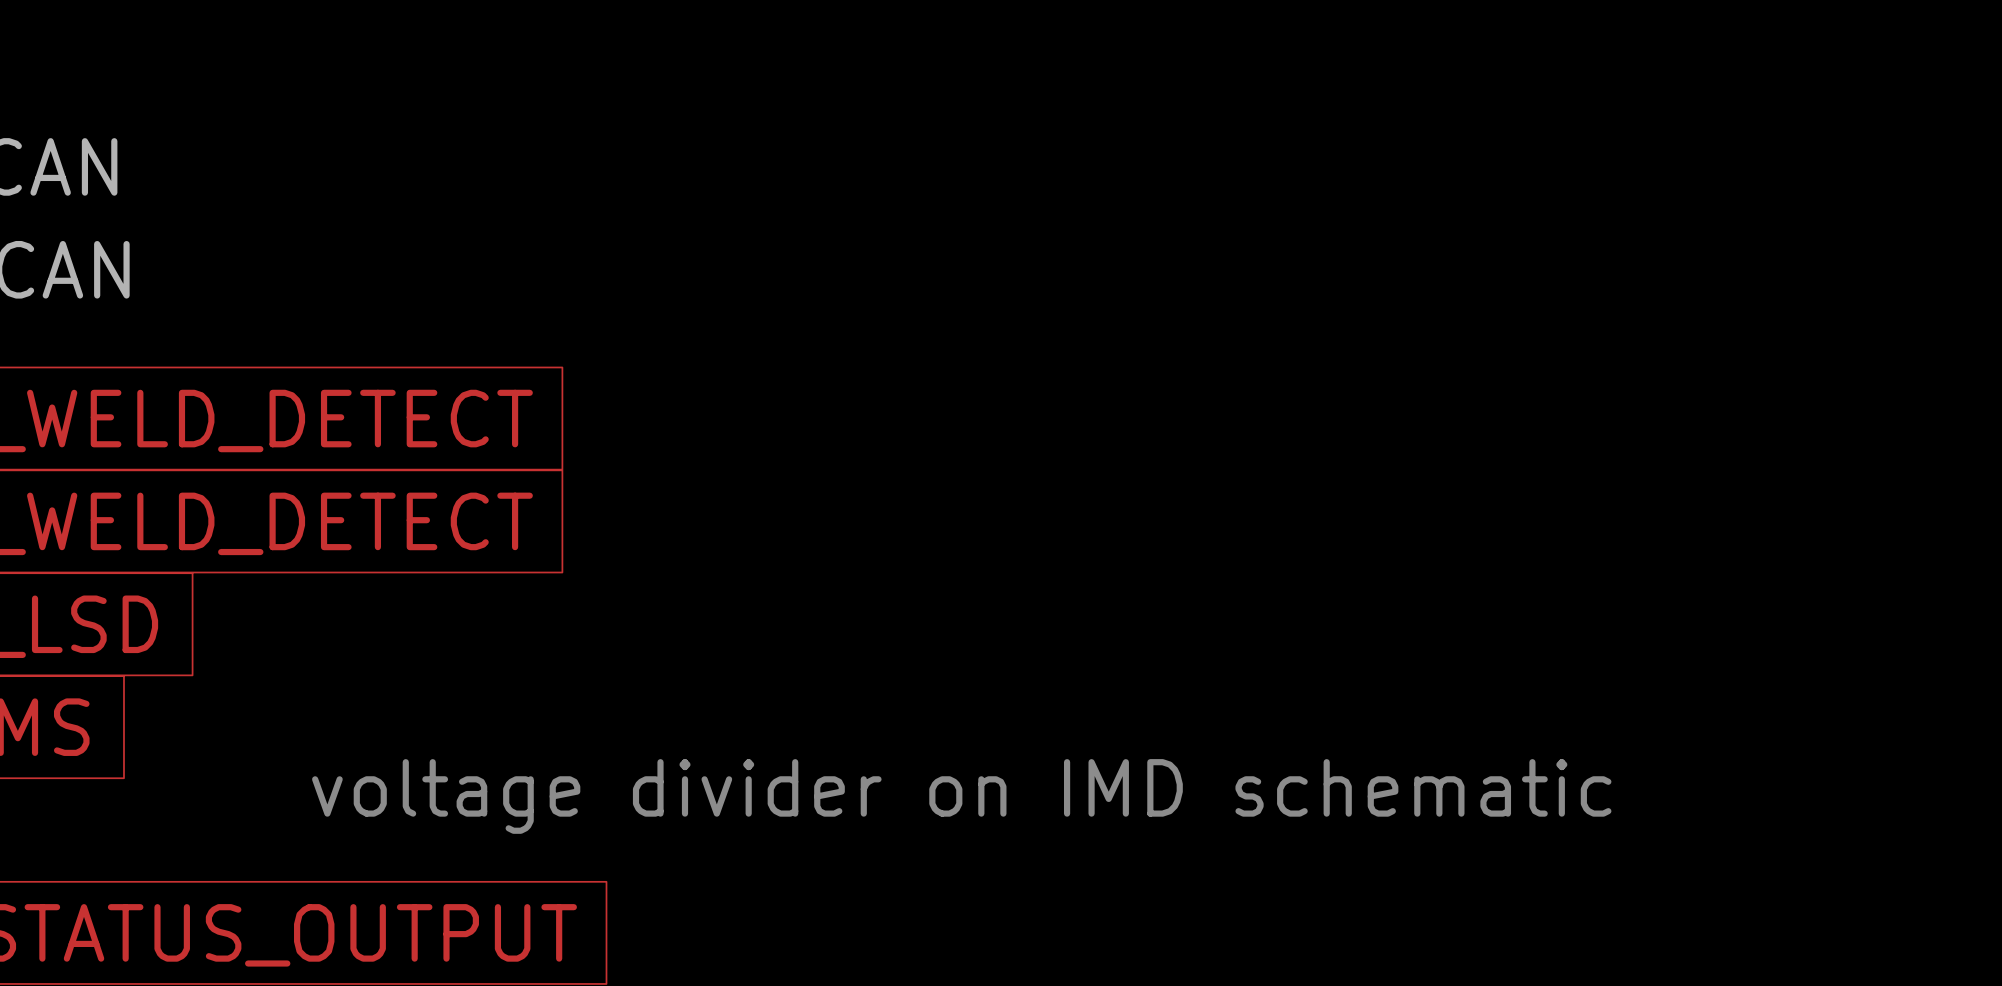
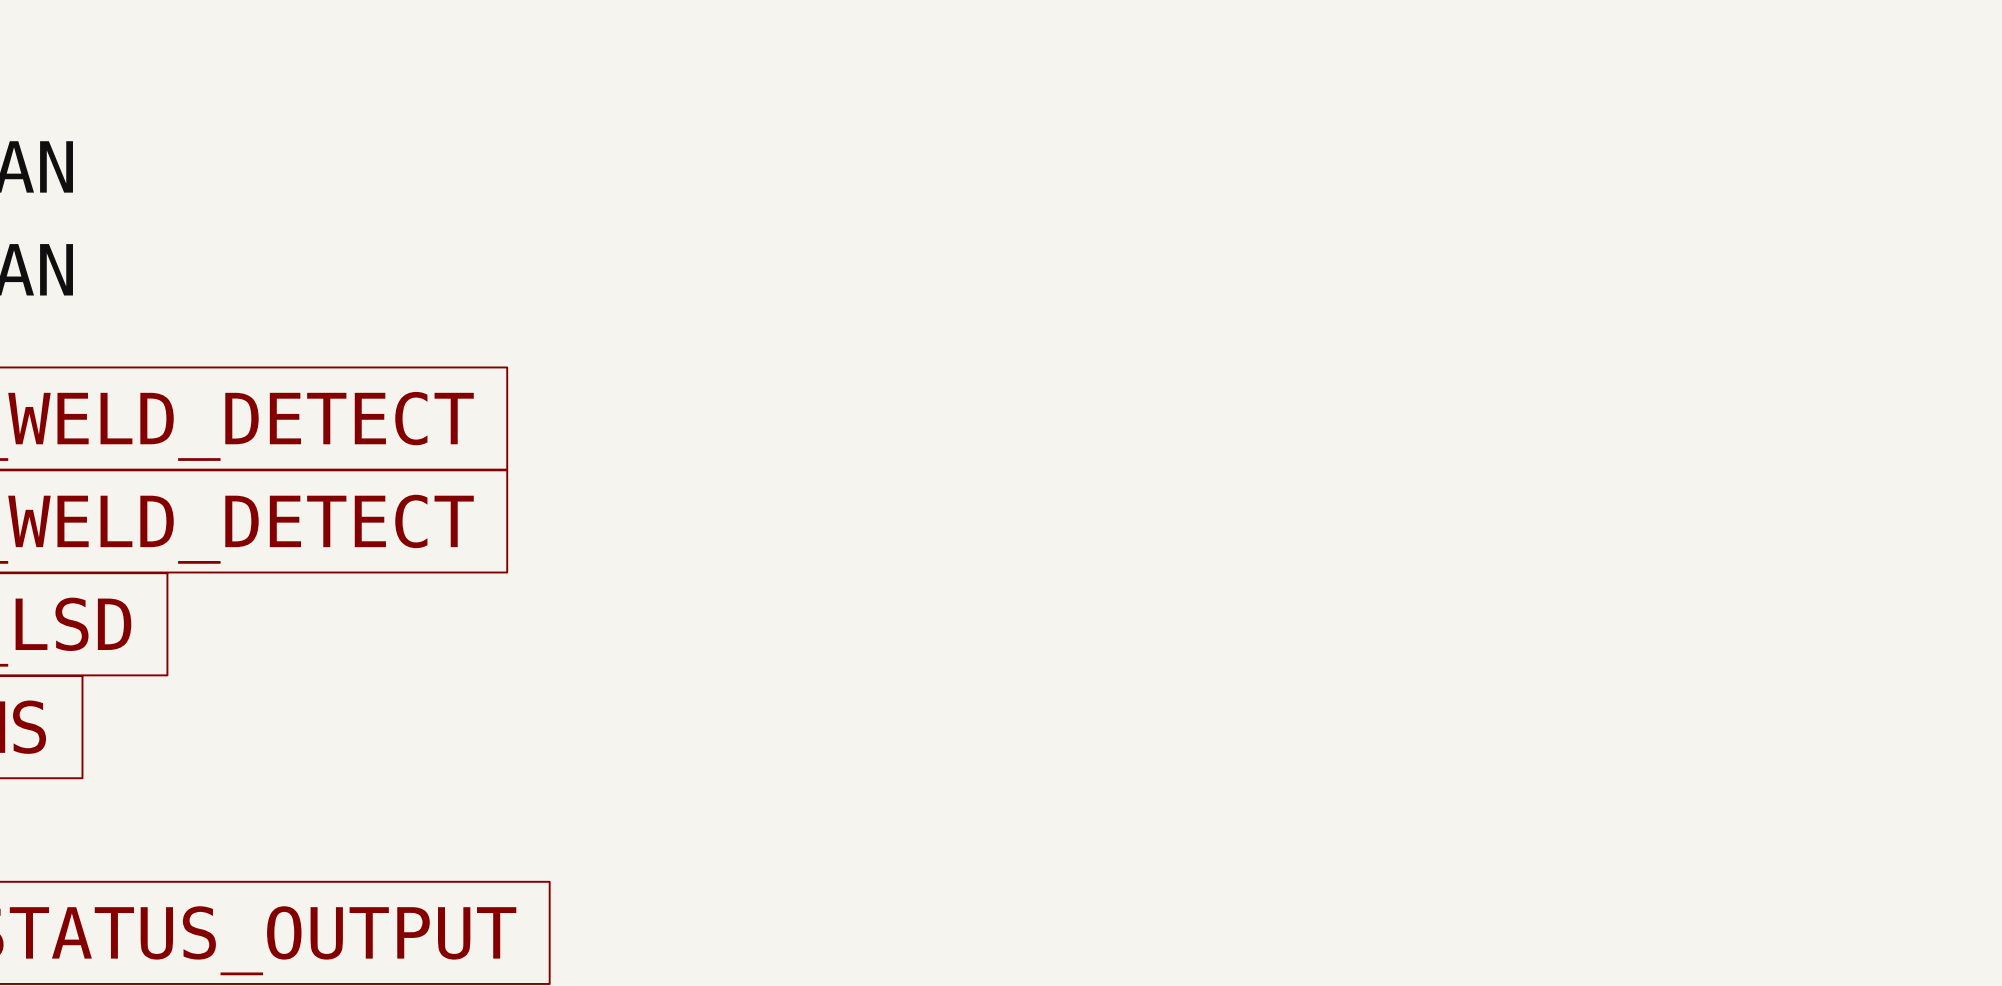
text: voltage divider on IMD schematic (961, 796) -> none

